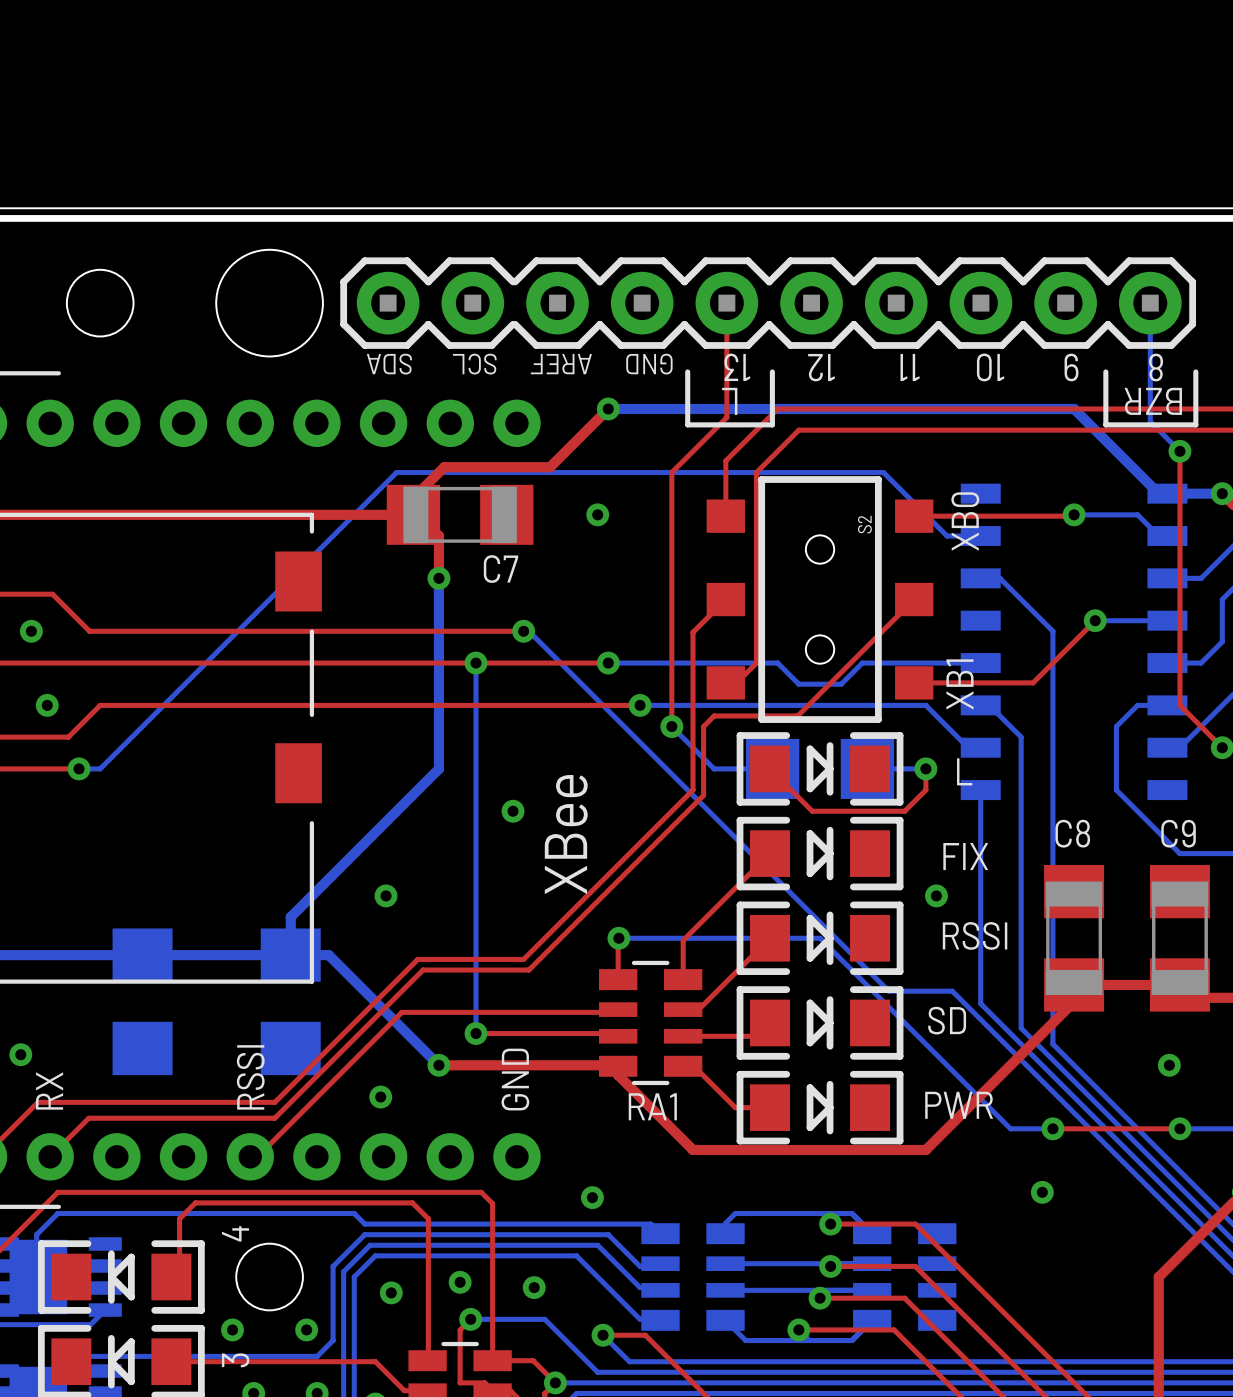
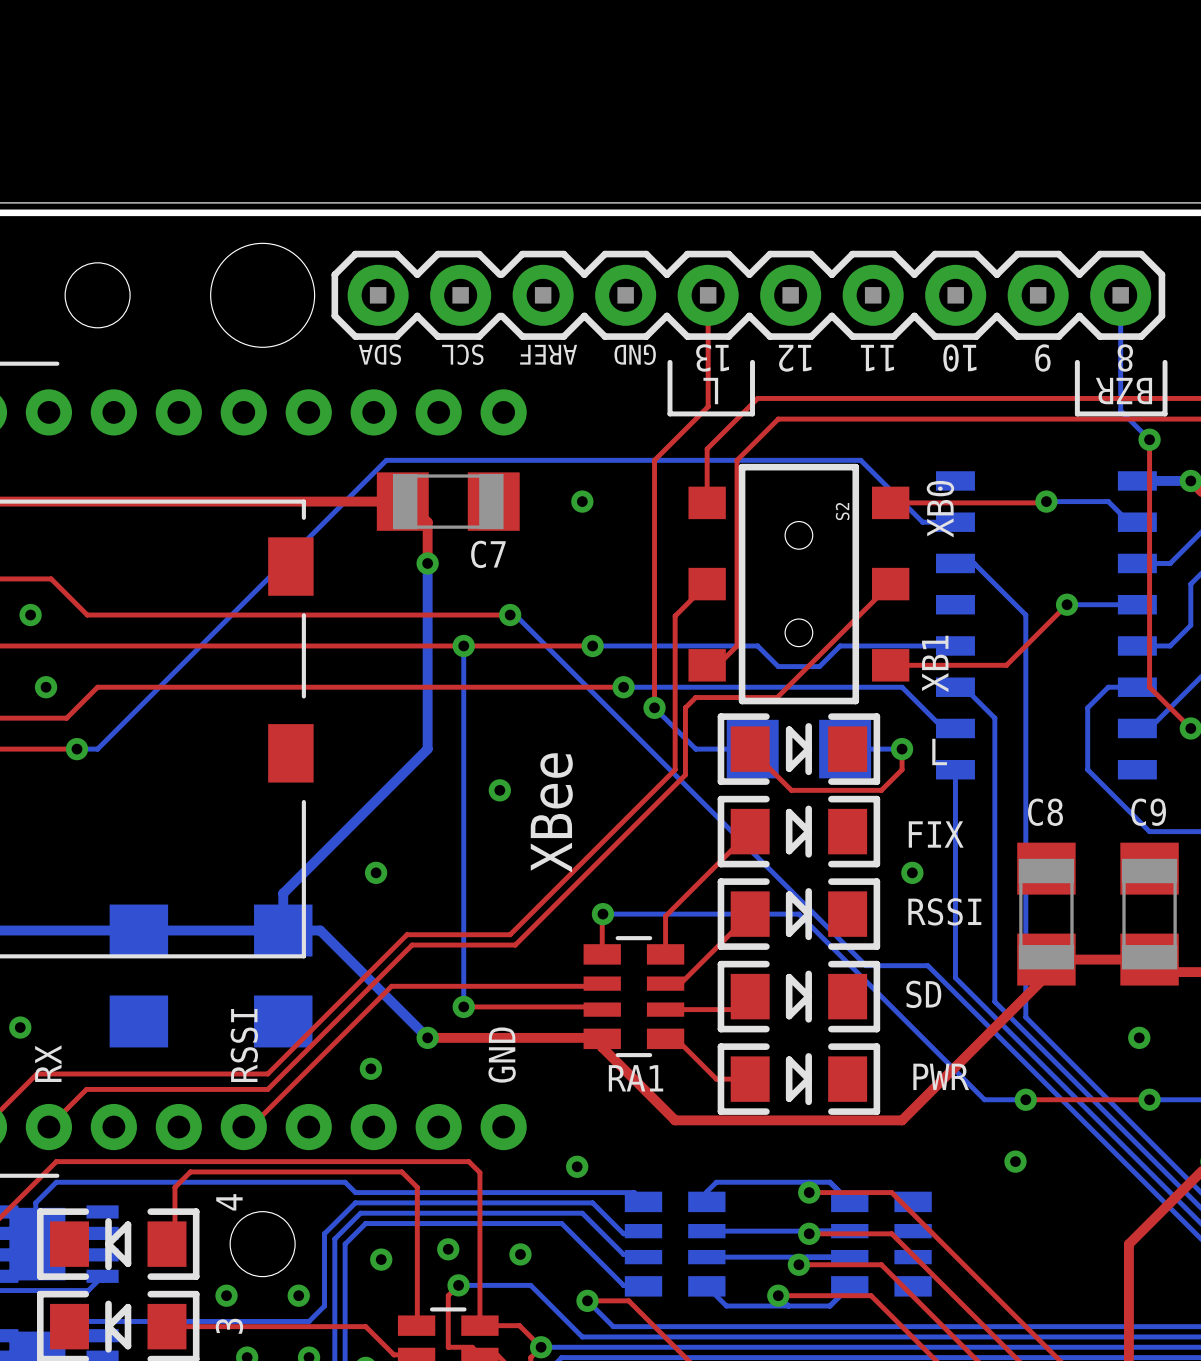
bottom track: (608, 408) (1074, 408) (1158, 493) -> none
top track: (608, 408) (550, 467) (444, 467) (413, 498) (413, 510) -> none
via: (608, 408) -> none

